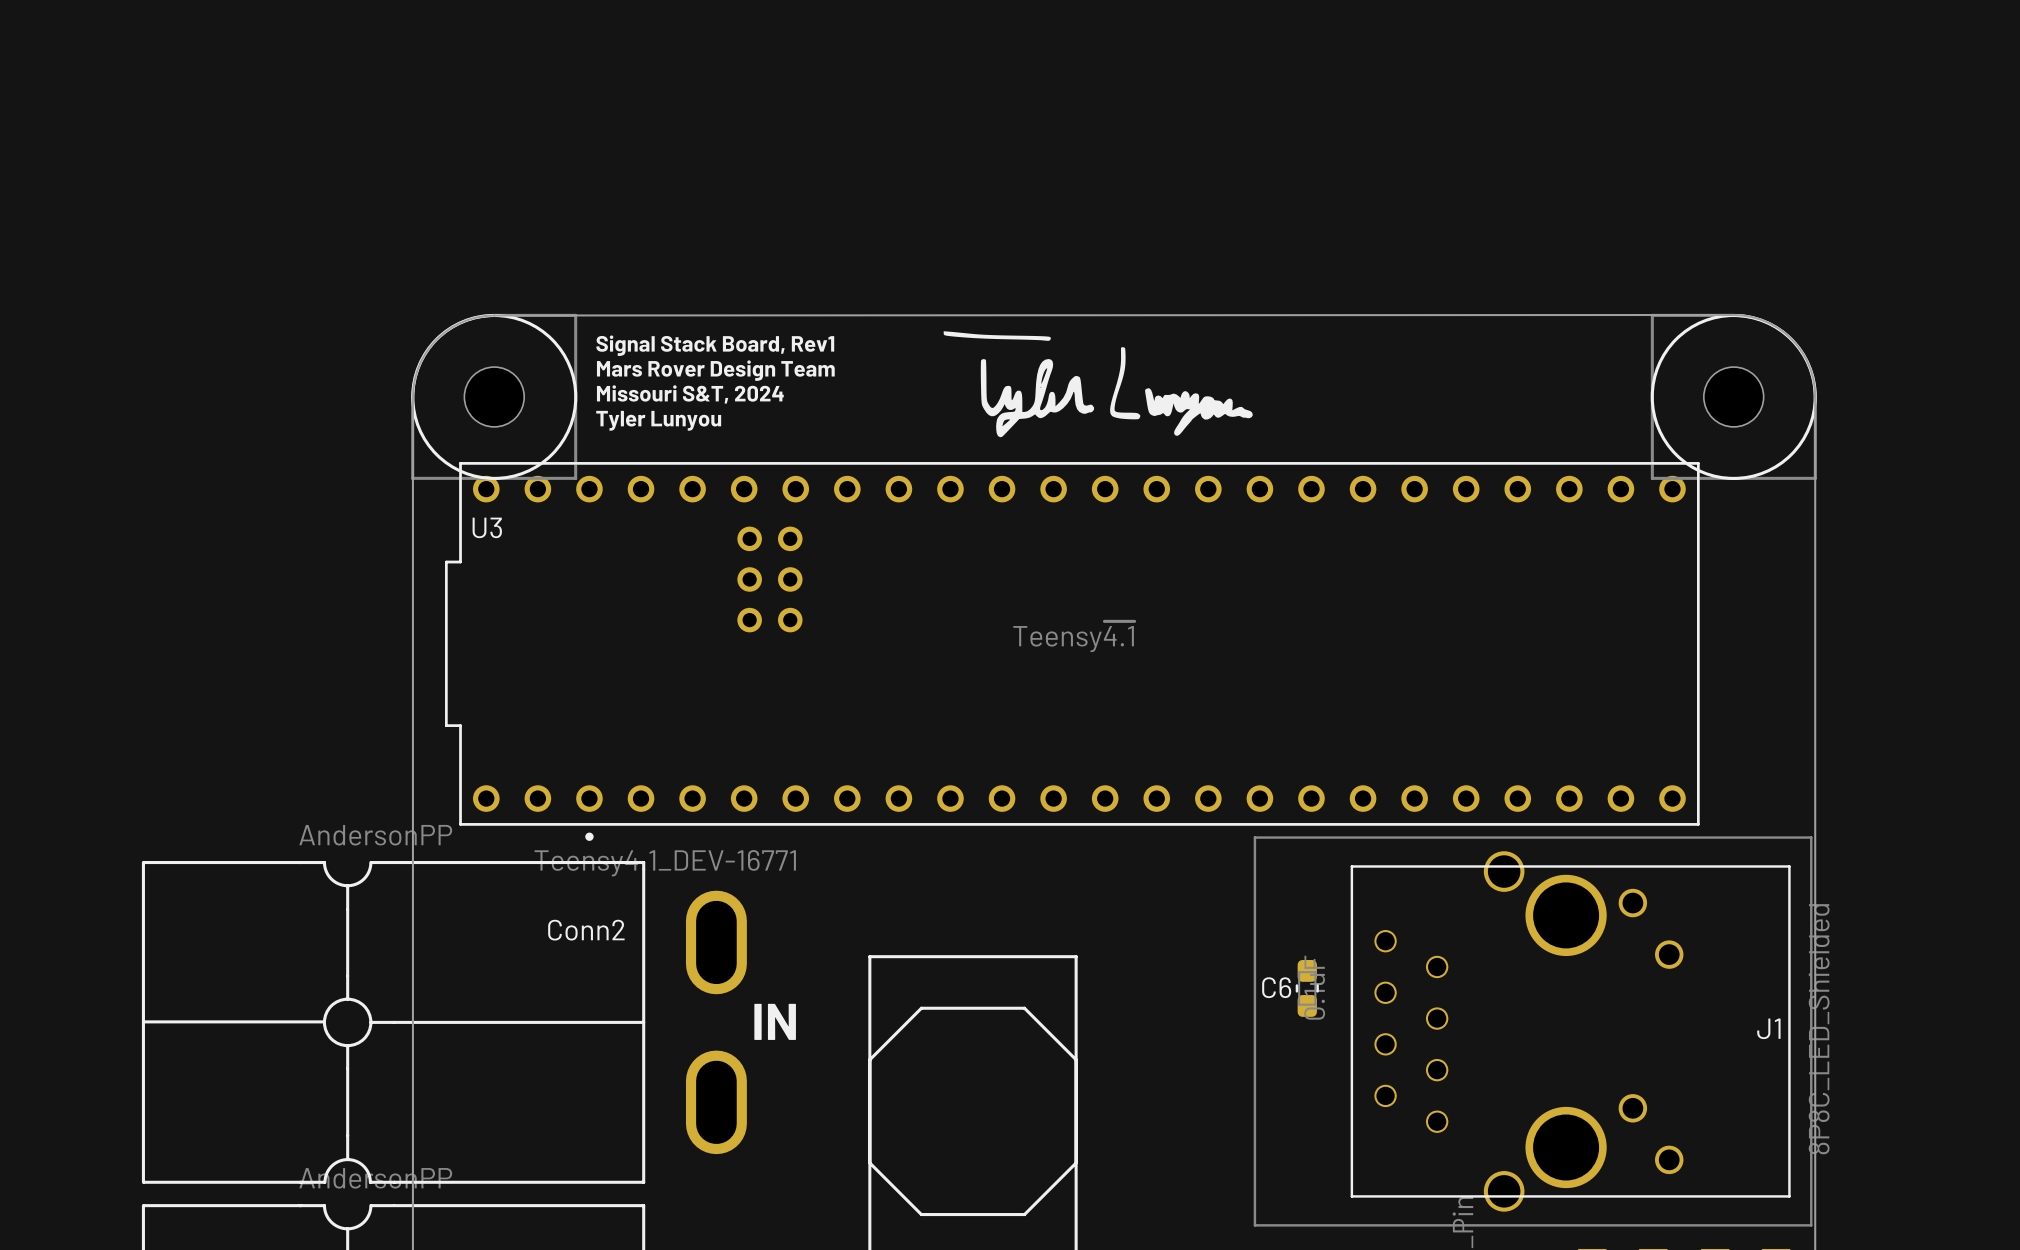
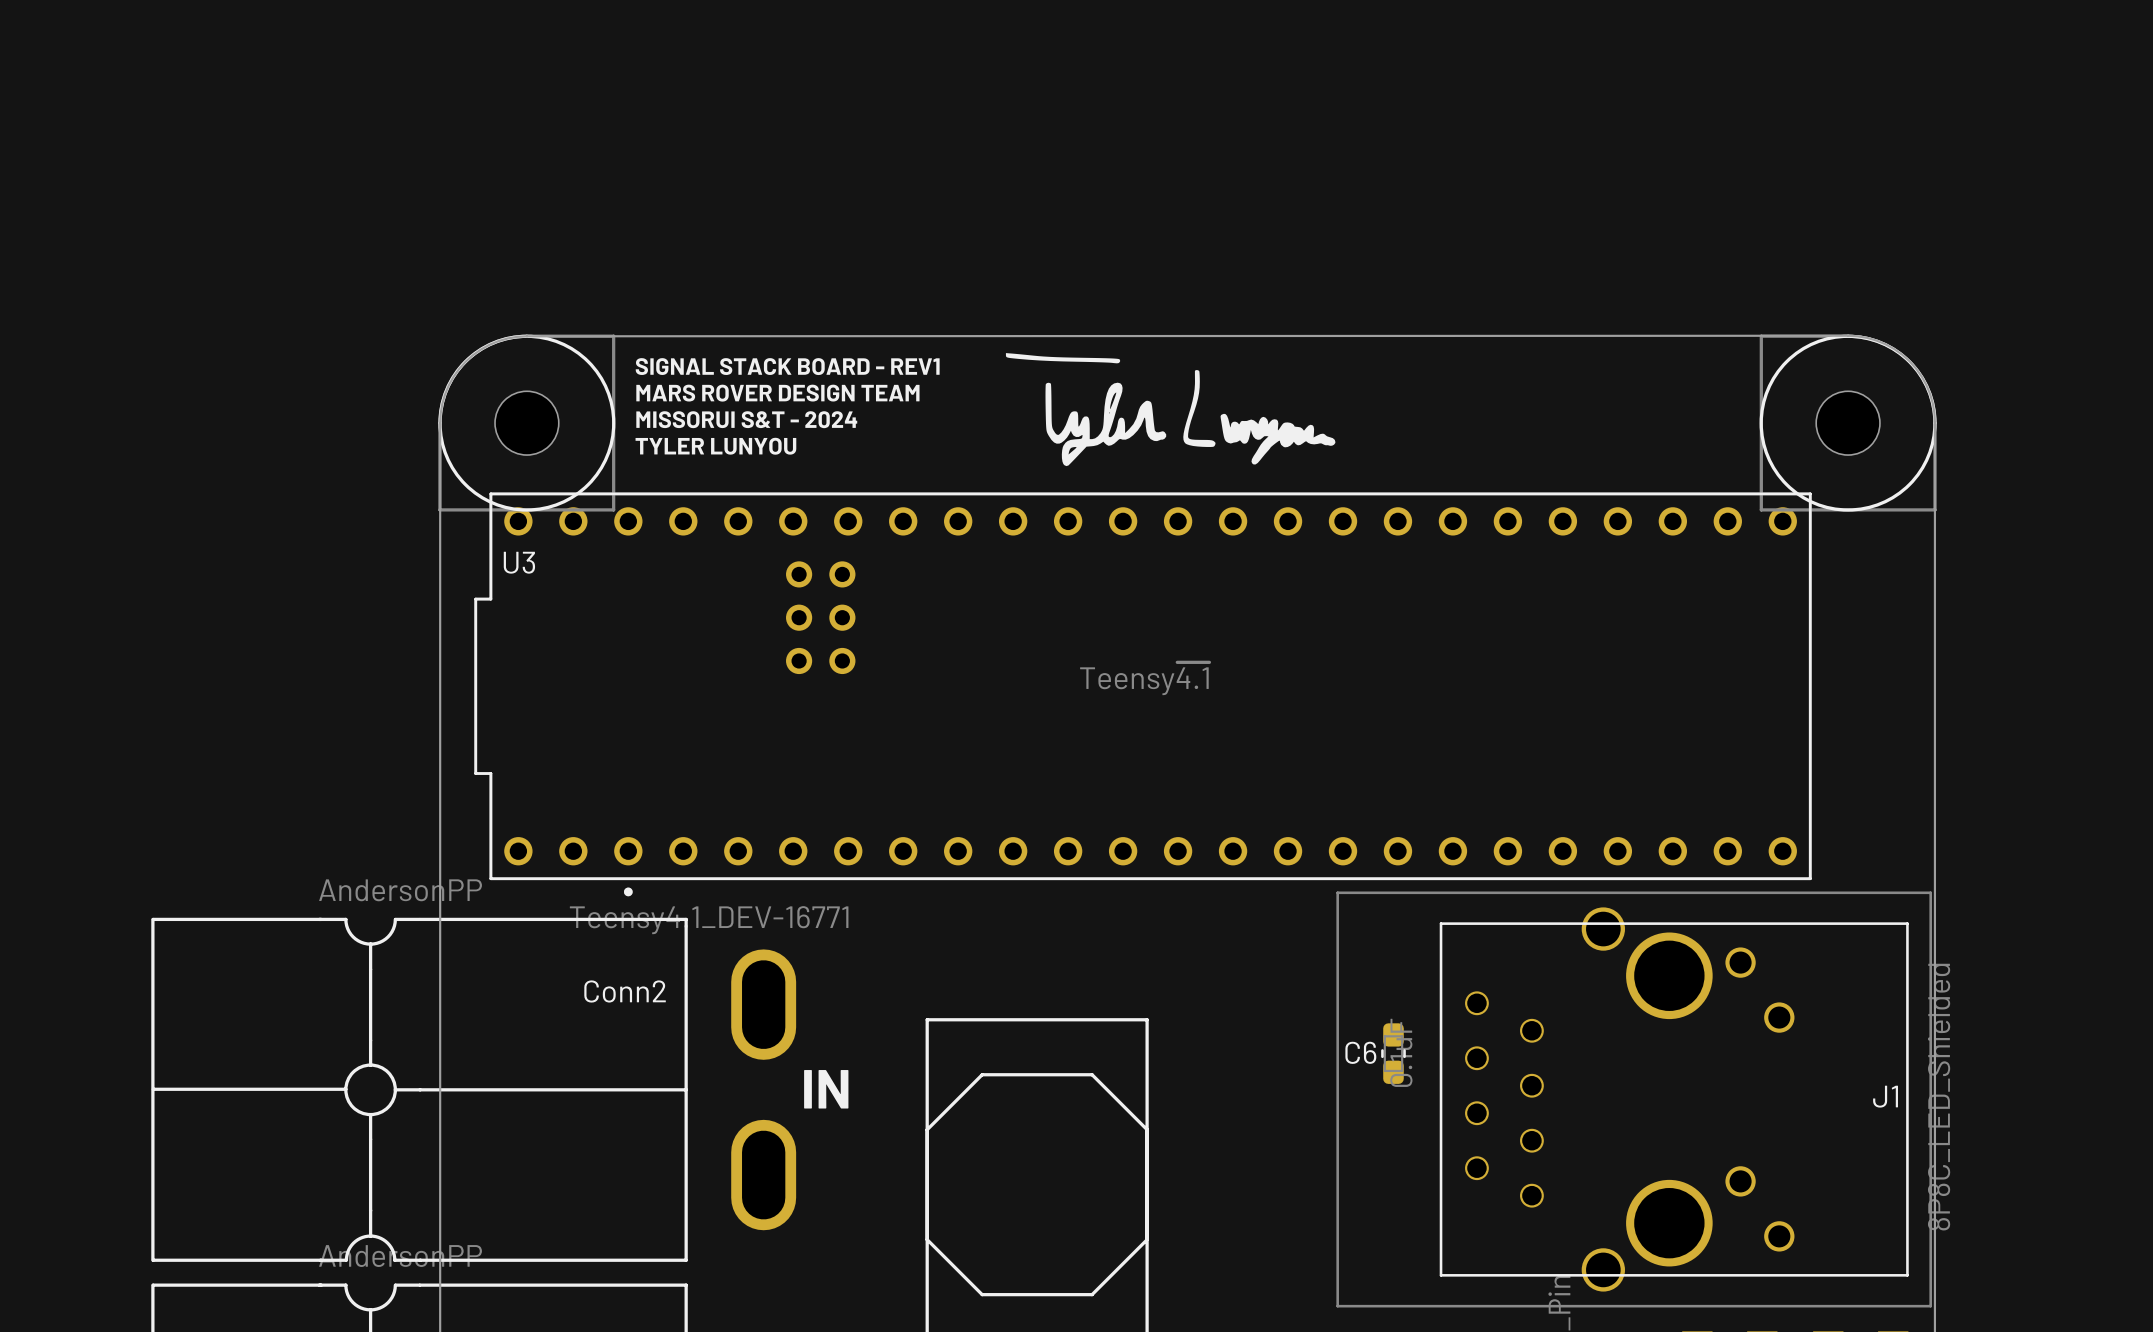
text: Signal Stack Board, Rev1 (715, 345) -> SIGNAL STACK BOARD - REV1 (787, 366)
text: Mars Rover Design Team (715, 370) -> MARS ROVER DESIGN TEAM (777, 393)
text: Missouri S&T, 2024 (690, 394) -> MISSORUI S&T - 2024 (746, 419)
text: Tyler Lunyou (658, 420) -> TYLER LUNYOU (715, 446)

